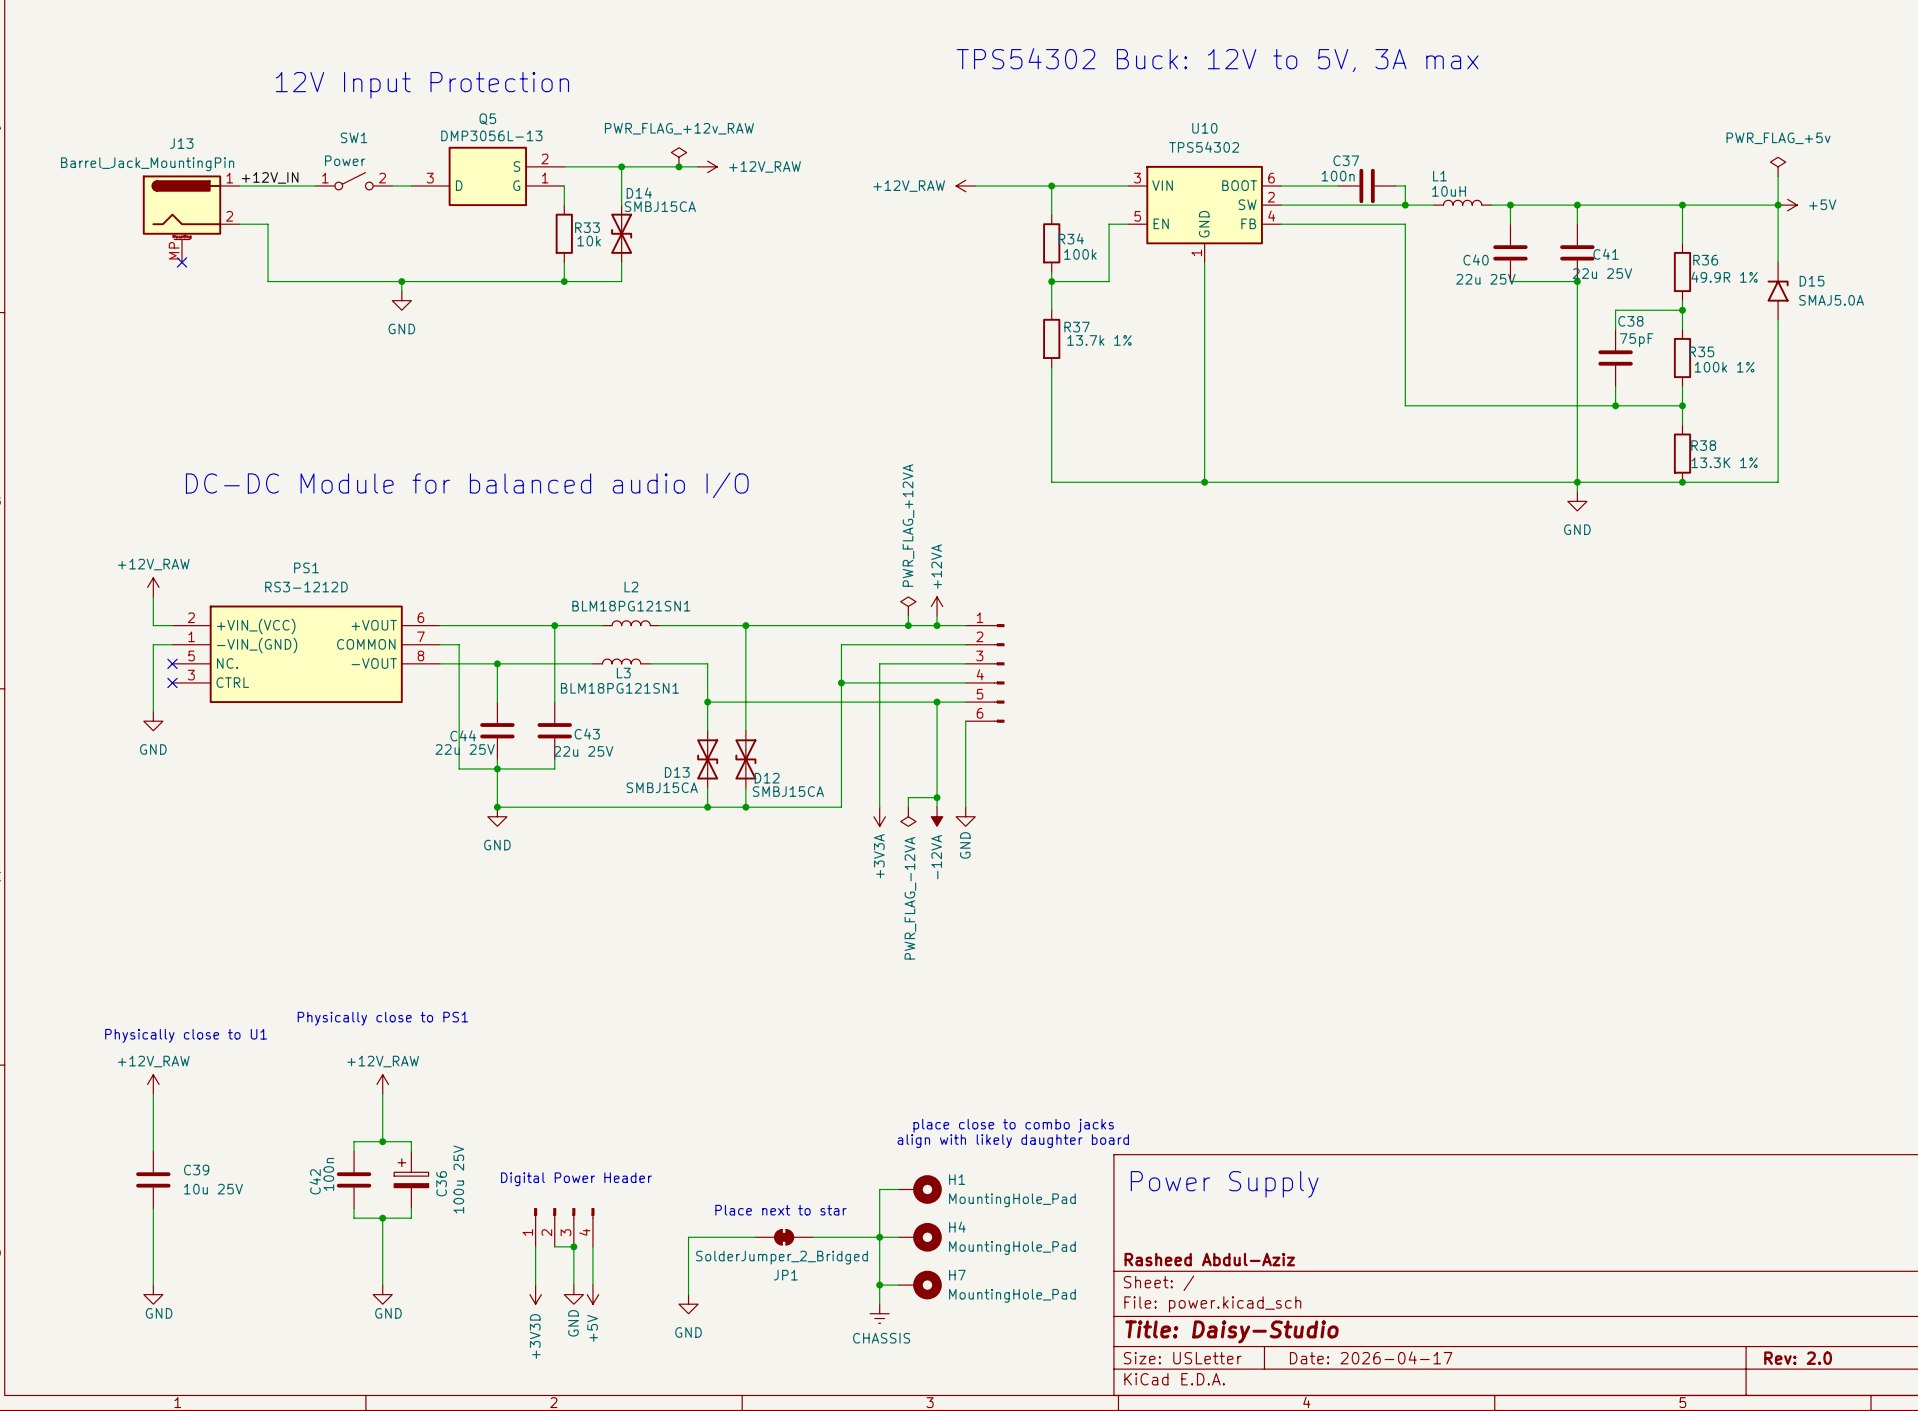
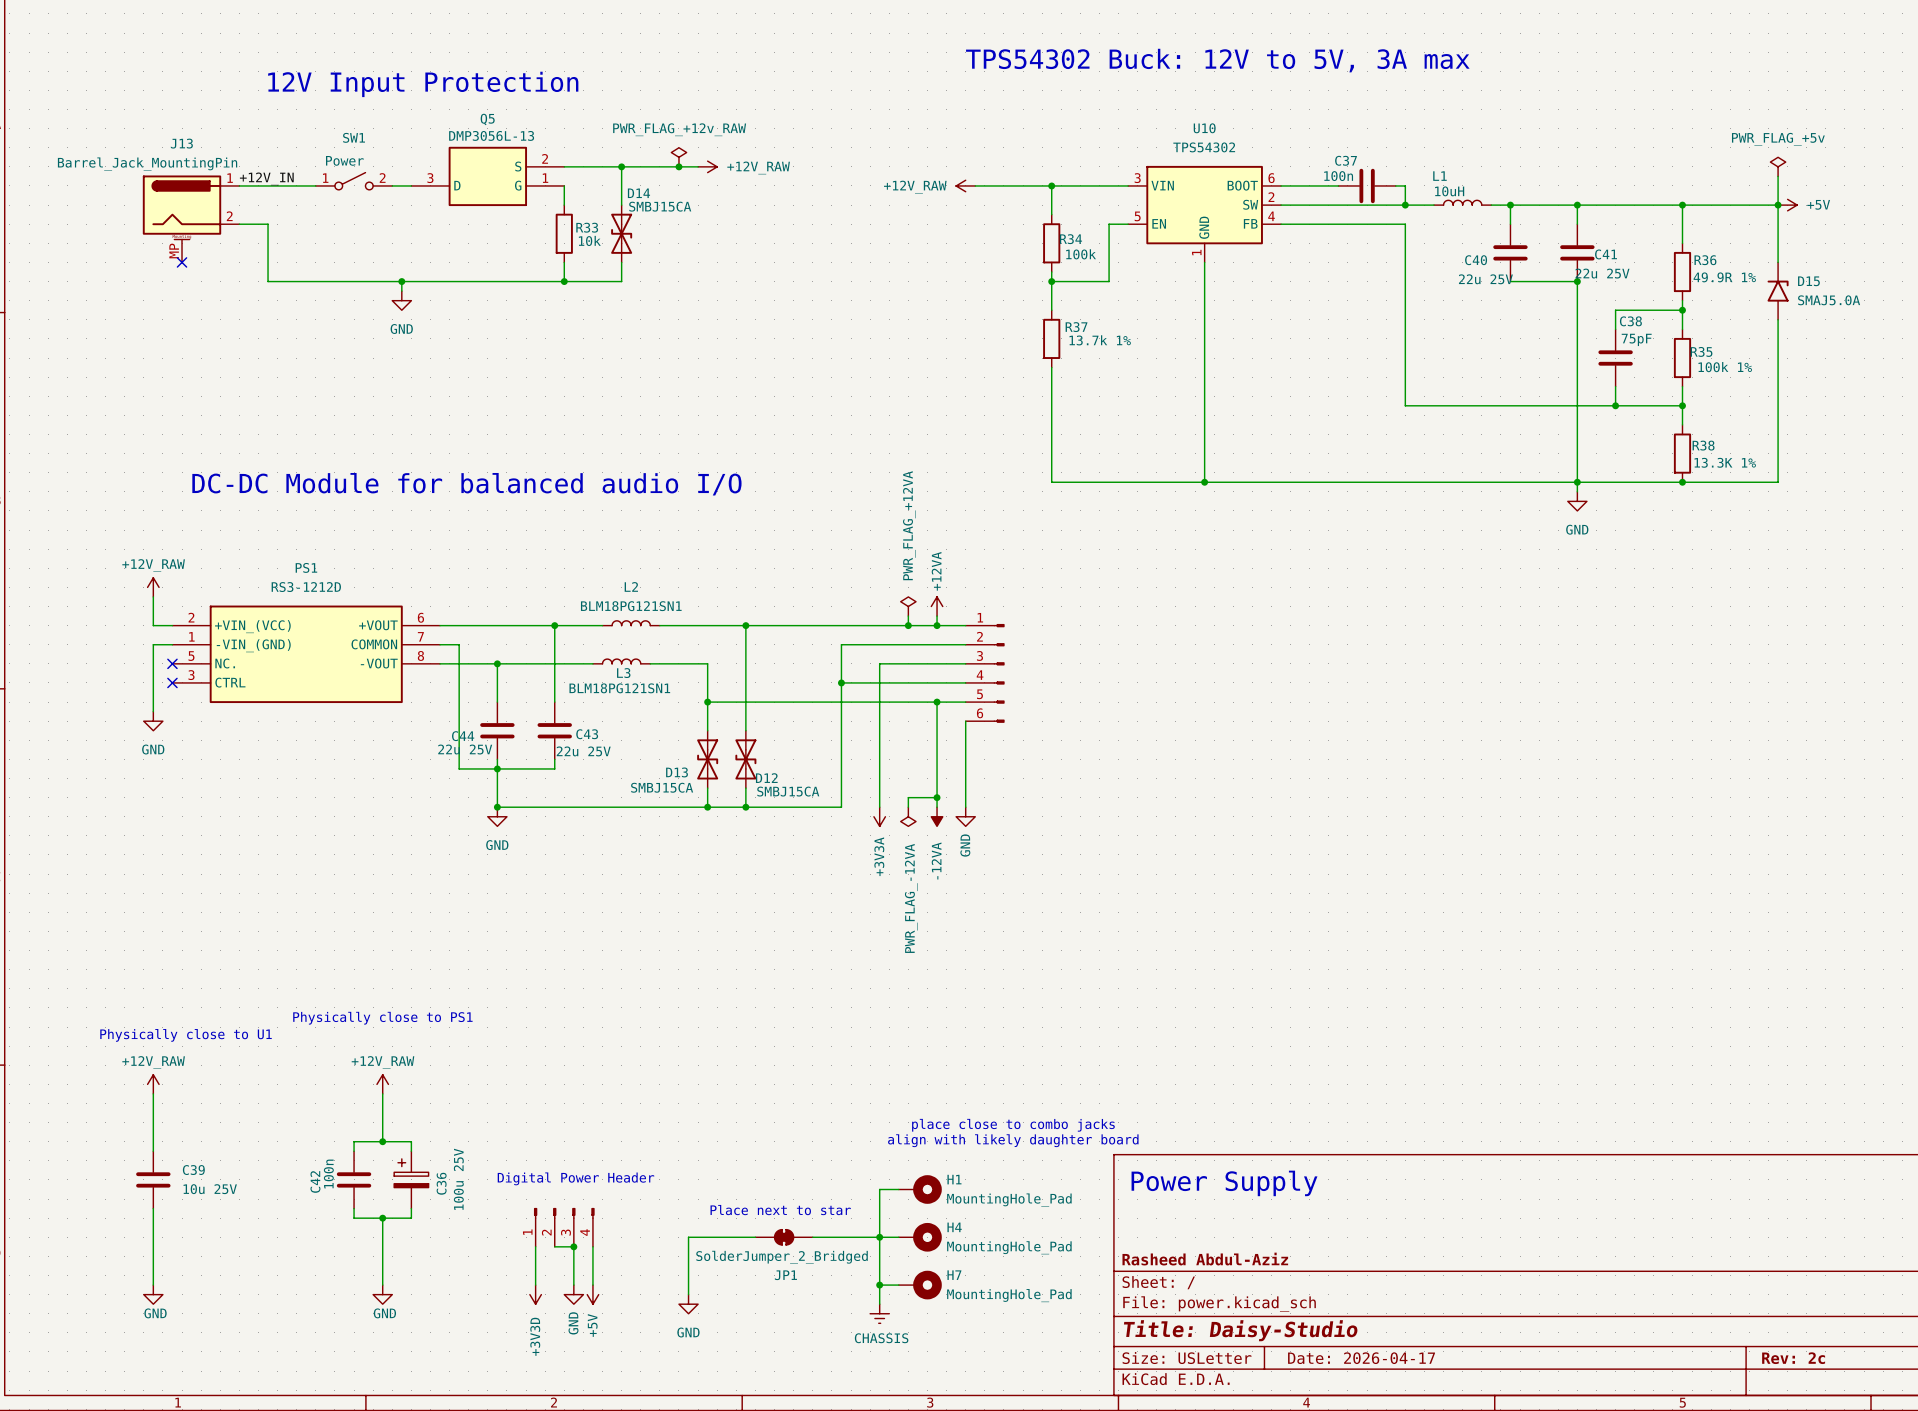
title block: Rev: 2.0 (1798, 1358) -> Rev: 2c (1793, 1358)

